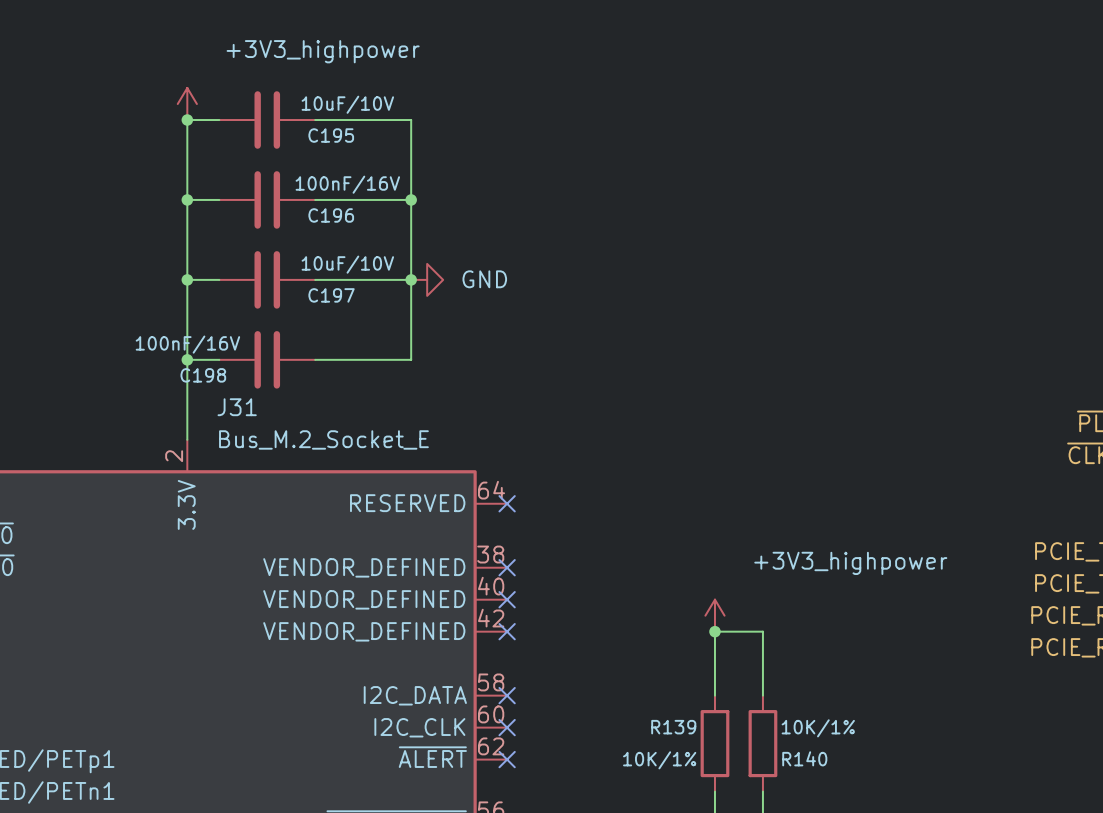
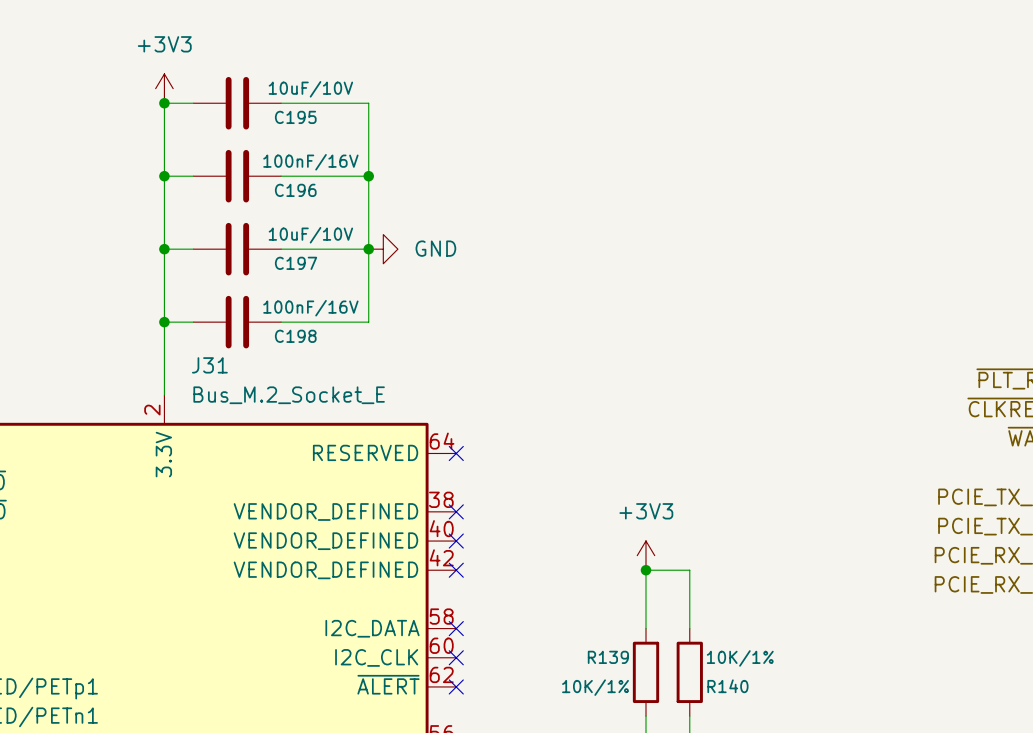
power symbol: +3V3_highpower (187, 104) -> +3V3 (164, 88)
C198 value position: 100nF/16V (187, 344) -> 100nF/16V (310, 308)
C198 name position: C198 (203, 375) -> C198 (295, 336)
power symbol: +3V3_highpower (714, 615) -> +3V3 (645, 555)

